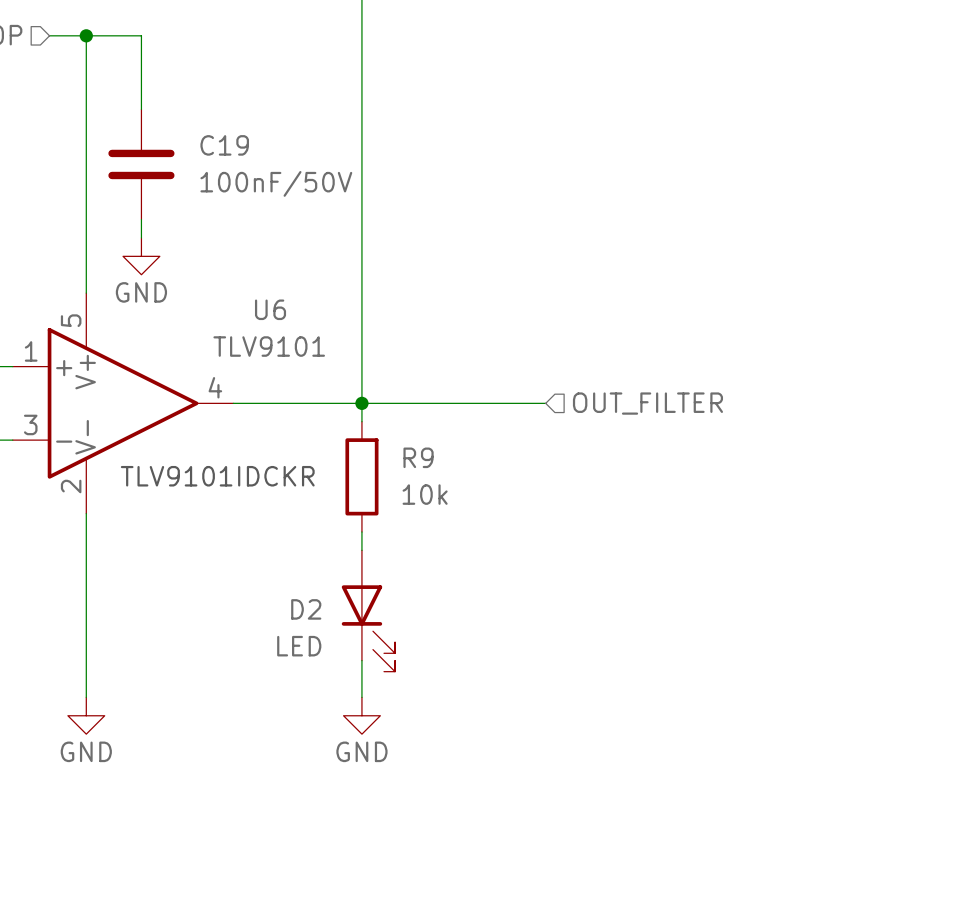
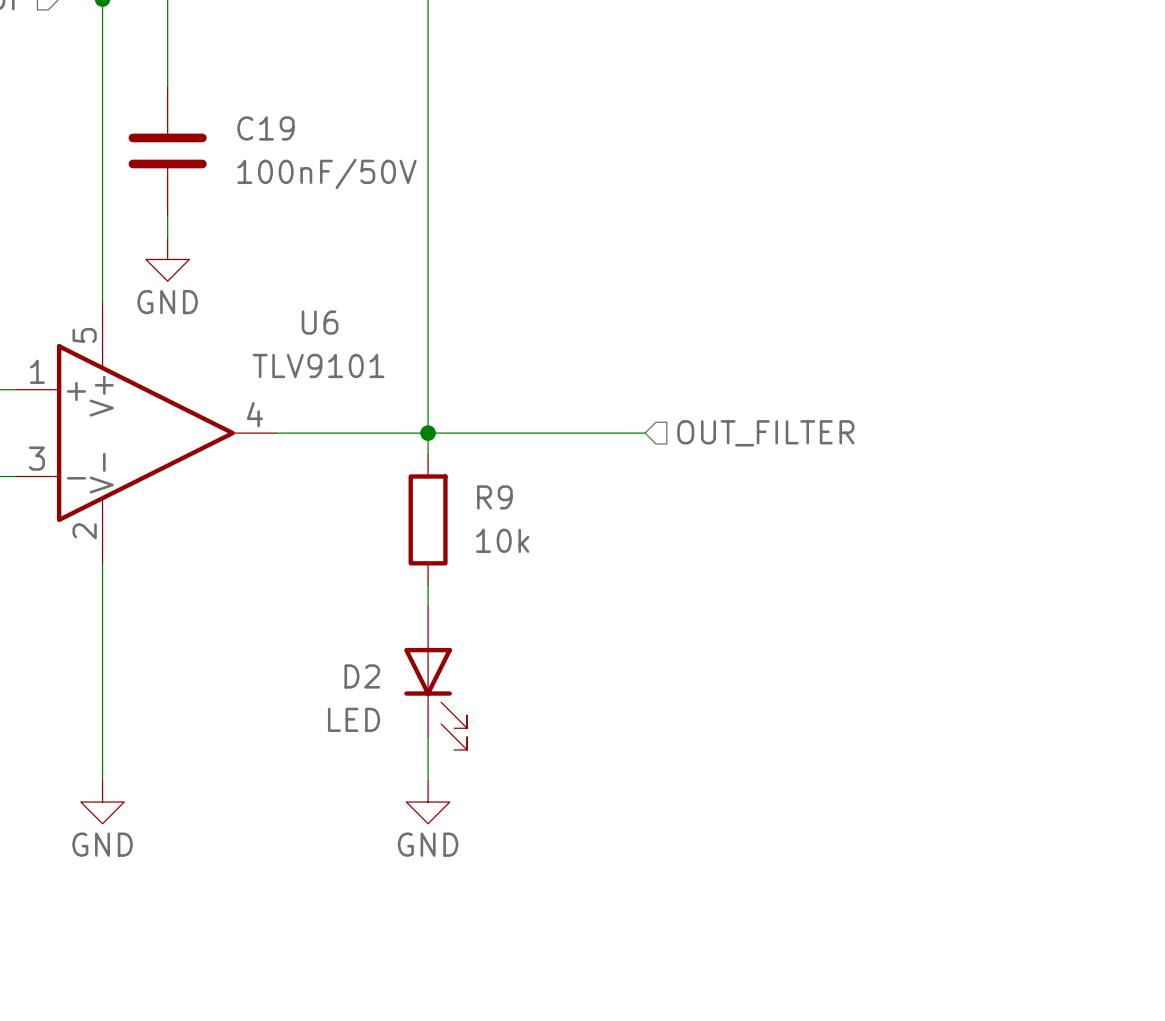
text: TLV9101IDCKR (217, 476) -> none

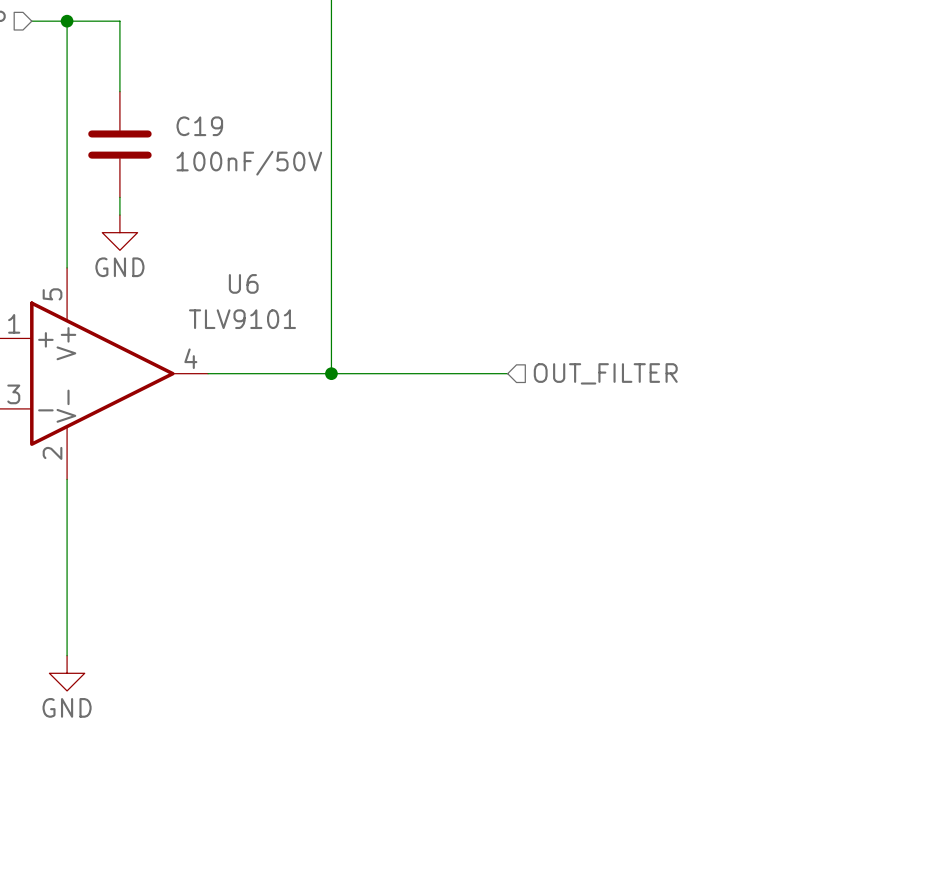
wire: (428, 433) (428, 454) -> none
R9: 10k (428, 519) -> none
wire: (428, 585) (428, 606) -> none
D2: LED (435, 678) -> none
wire: (428, 736) (428, 780) -> none
power symbol: GND (428, 802) -> none

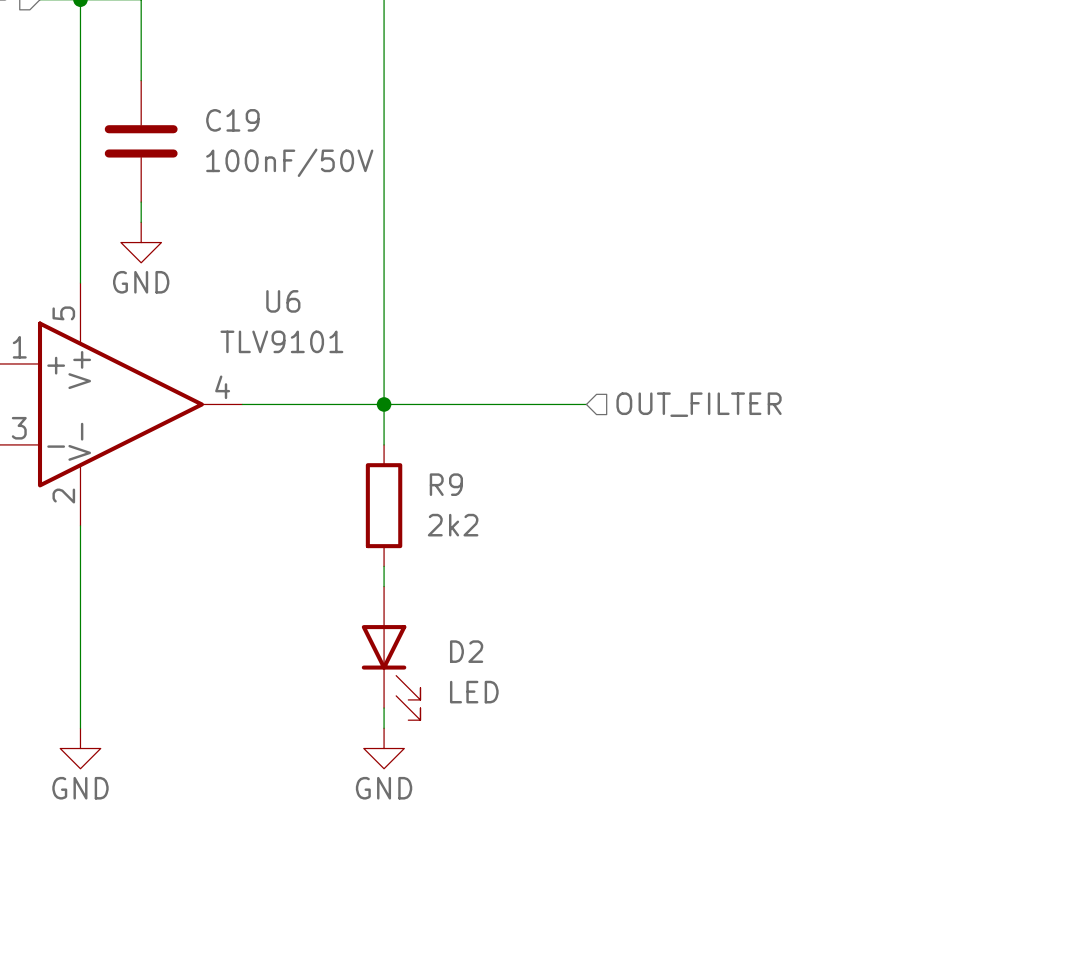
wire: none -> (384, 404) (384, 444)
R9: none -> 2k2 (384, 505)
wire: none -> (384, 566) (384, 586)
D2: none -> LED (391, 653)
wire: none -> (384, 708) (384, 728)
power symbol: none -> GND (384, 748)

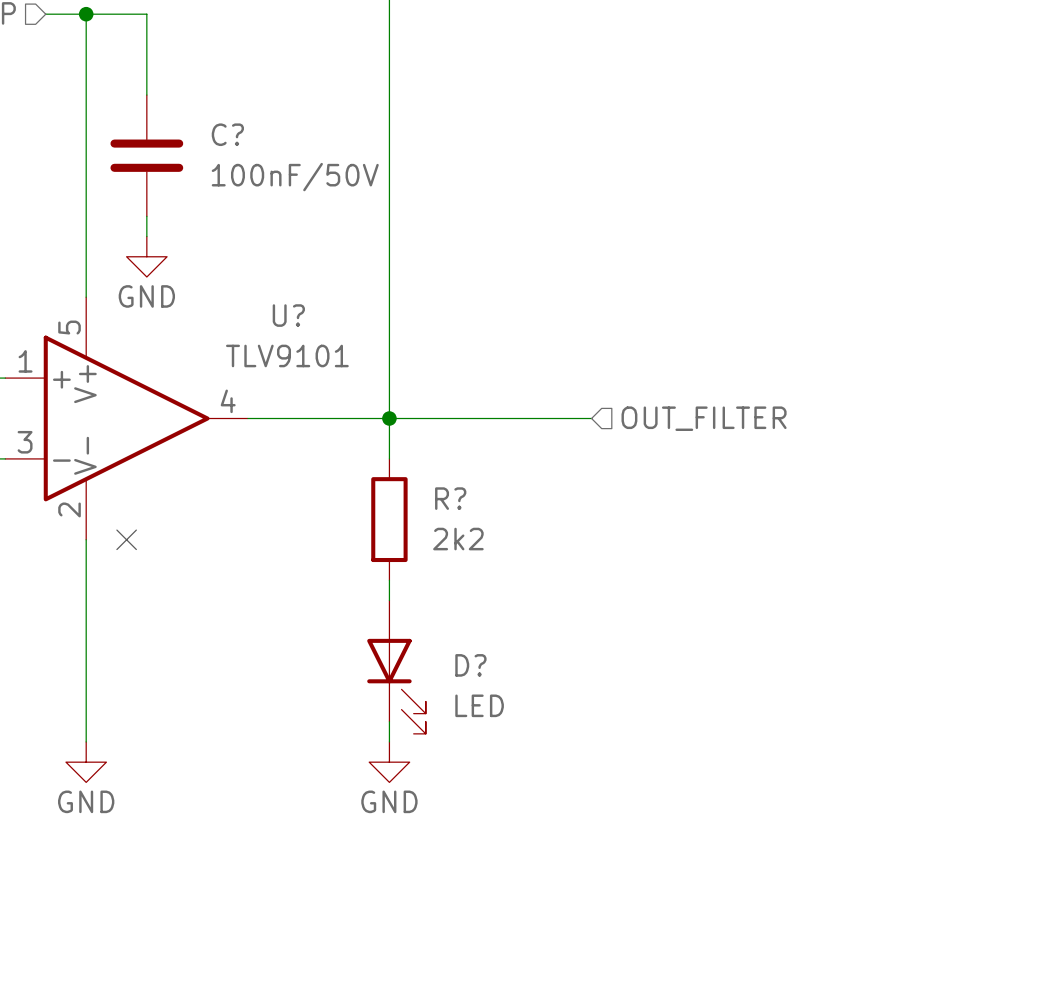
C19 name: C19 (232, 120) -> C? (227, 134)
U6 name: U6 (283, 301) -> U? (288, 315)
R9 name: R9 (446, 484) -> R? (450, 498)
no-connect mark: none -> (126, 539)
D2 name: D2 (466, 651) -> D? (470, 665)

